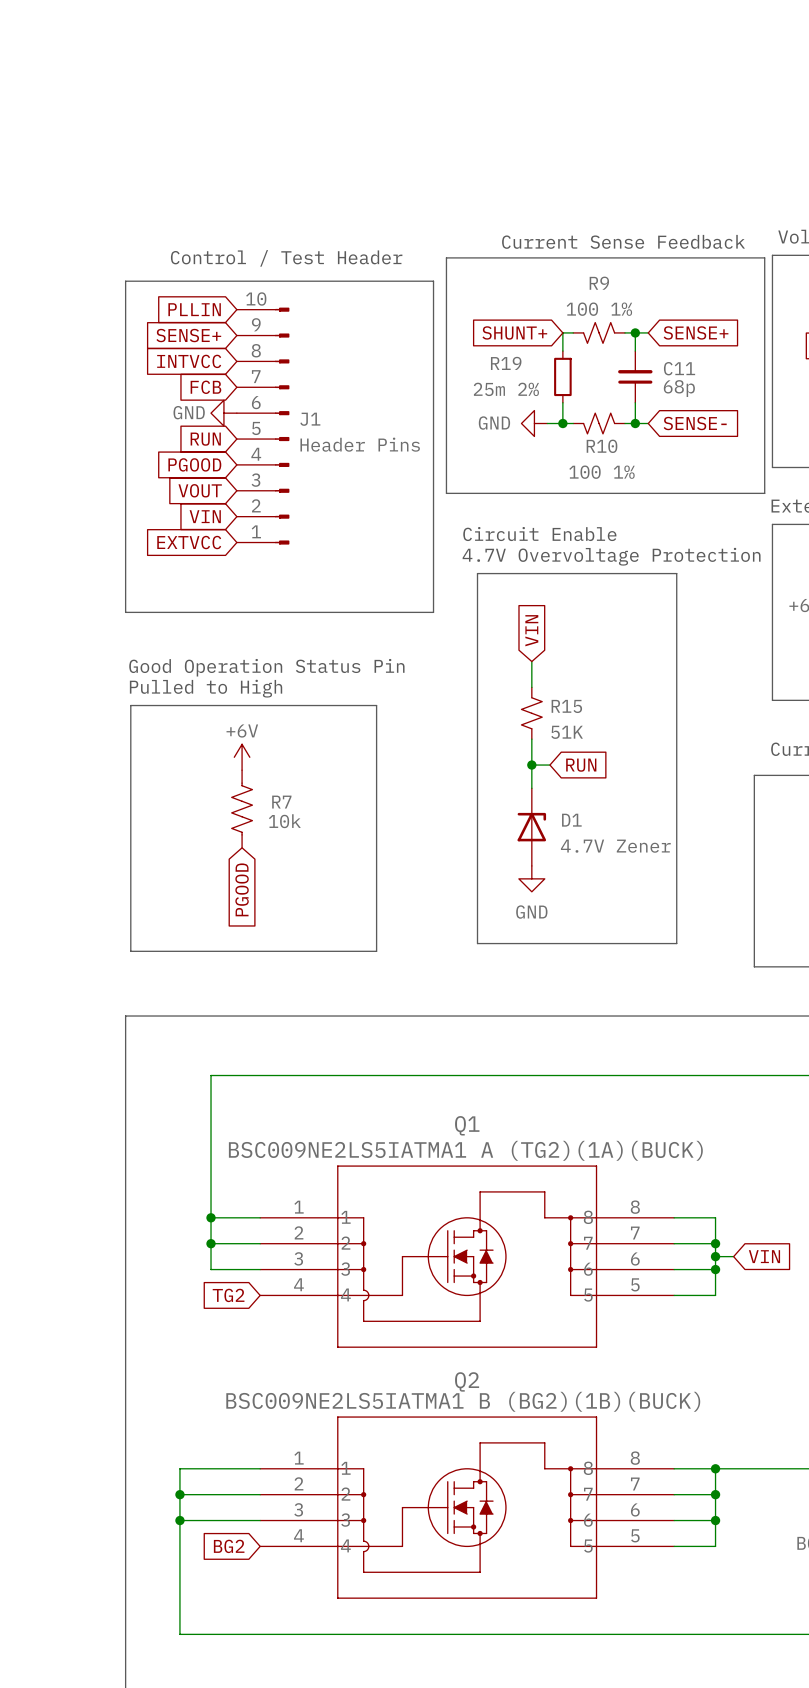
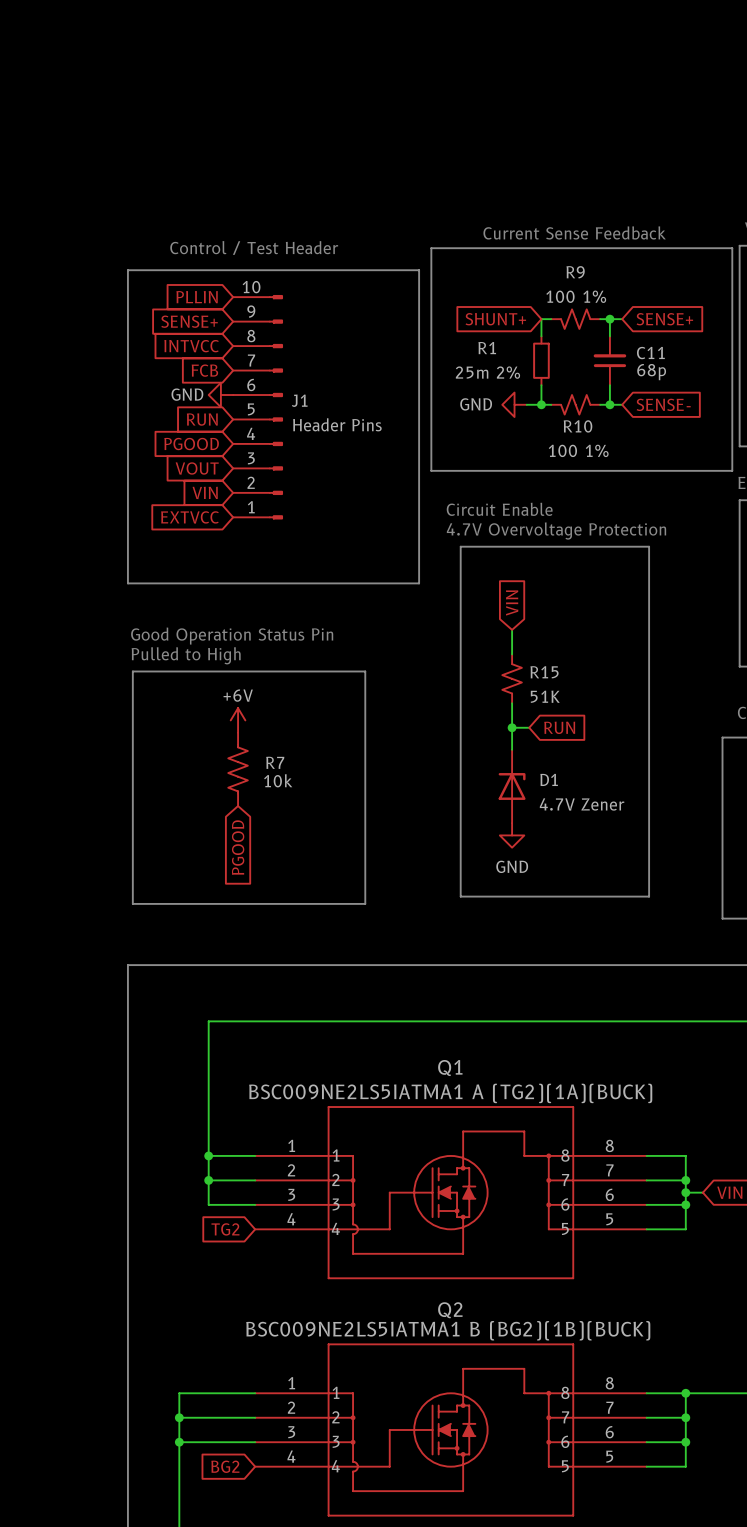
R19 name: R19 (506, 363) -> R1 (487, 348)

